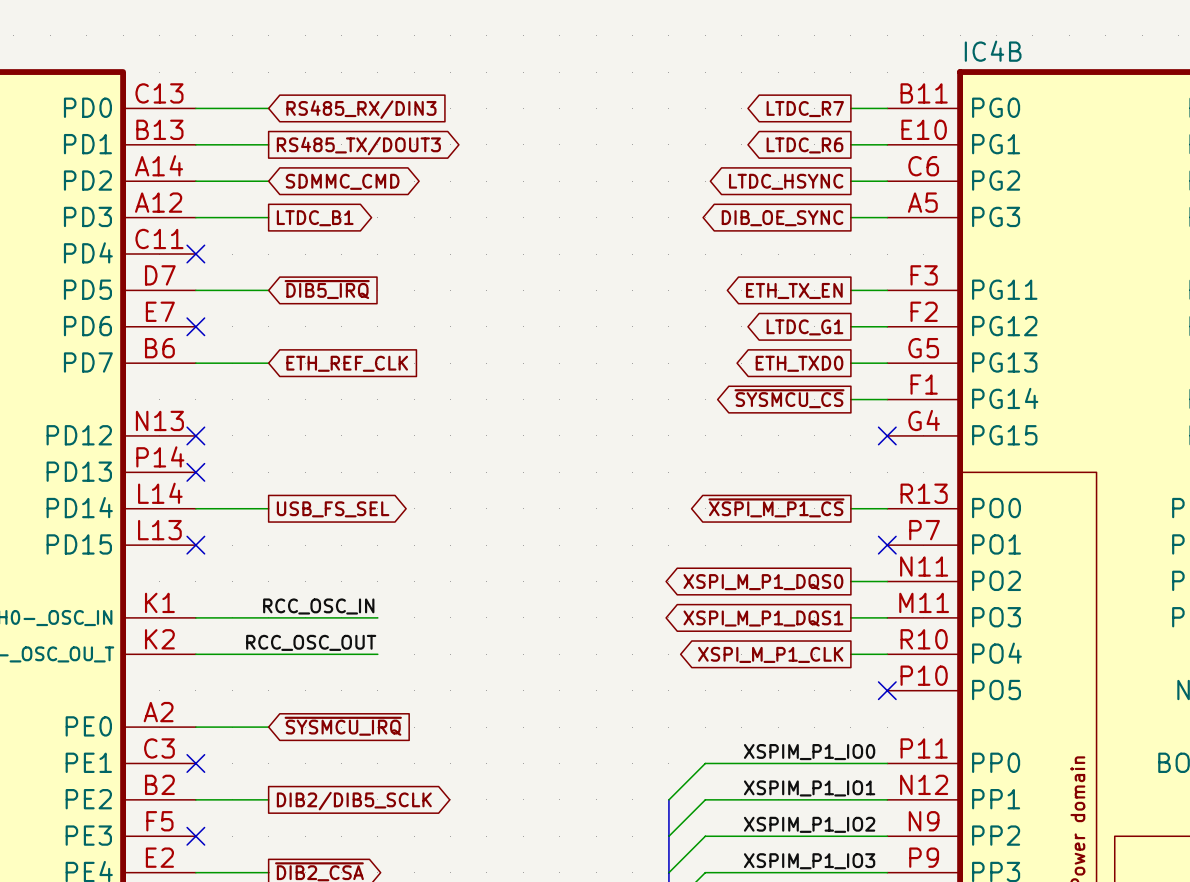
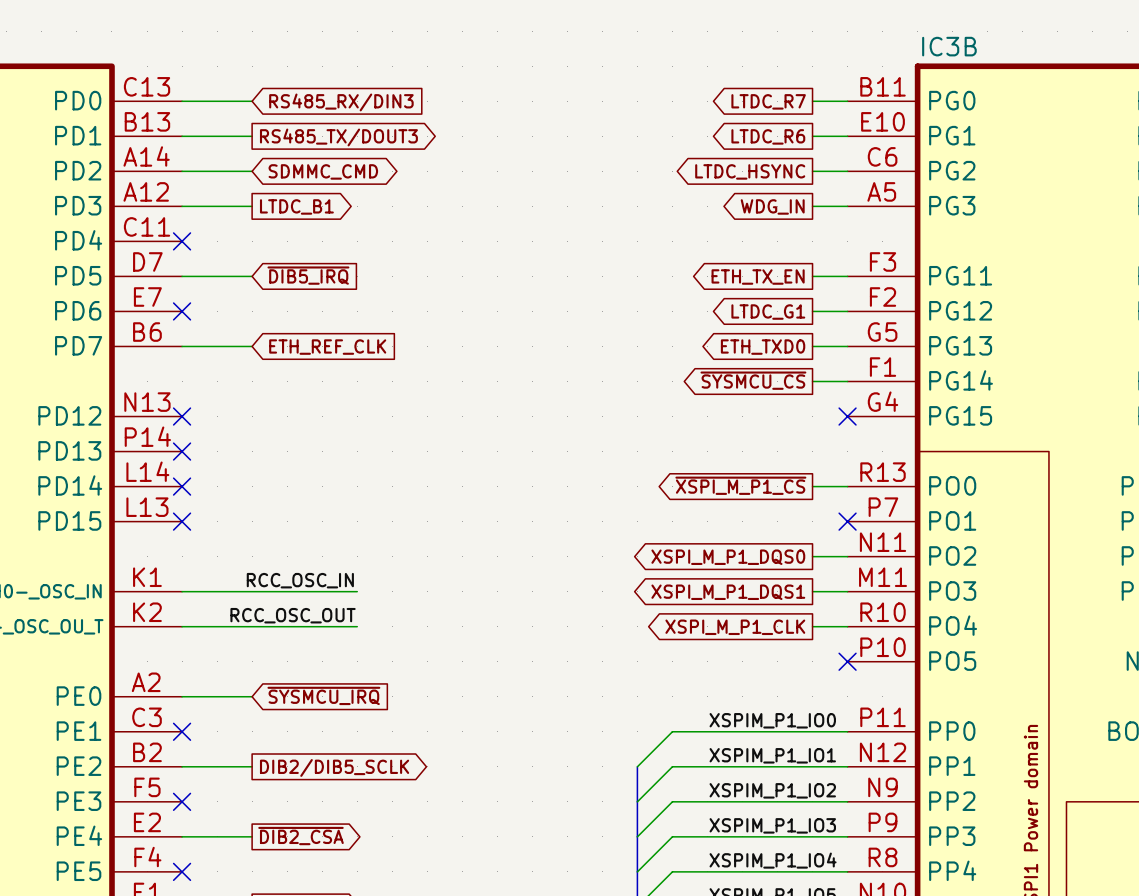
IC4B name: IC4B (993, 51) -> IC3B (949, 46)
global label: DIB_OE_SYNC (782, 218) -> WDG_IN (772, 206)
wire: (195, 508) (268, 508) -> none
no-connect mark: none -> (182, 486)
global label: USB_FS_SEL (333, 509) -> none

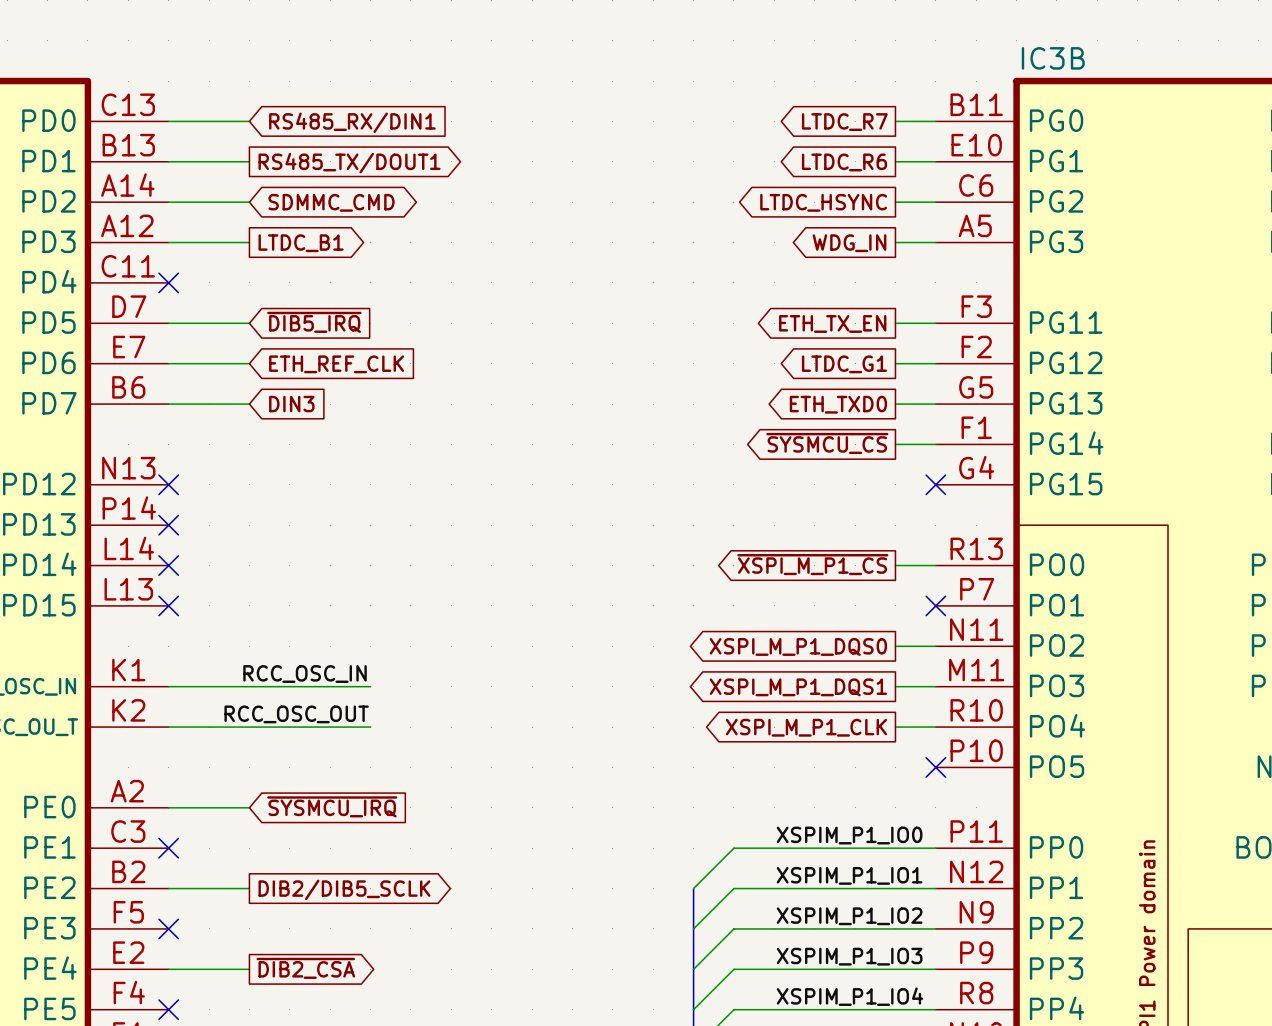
global label: RS485_RX/DIN3 (341, 102) -> RS485_RX/DIN1 (352, 122)
global label: RS485_TX/DOUT3 (338, 137) -> RS485_TX/DOUT1 (349, 163)
wire: none -> (168, 363) (249, 363)
no-connect mark: (182, 311) -> none
global label: none -> ETH_REF_CLK (336, 364)
global label: ETH_REF_CLK (327, 347) -> DIN3 (291, 404)

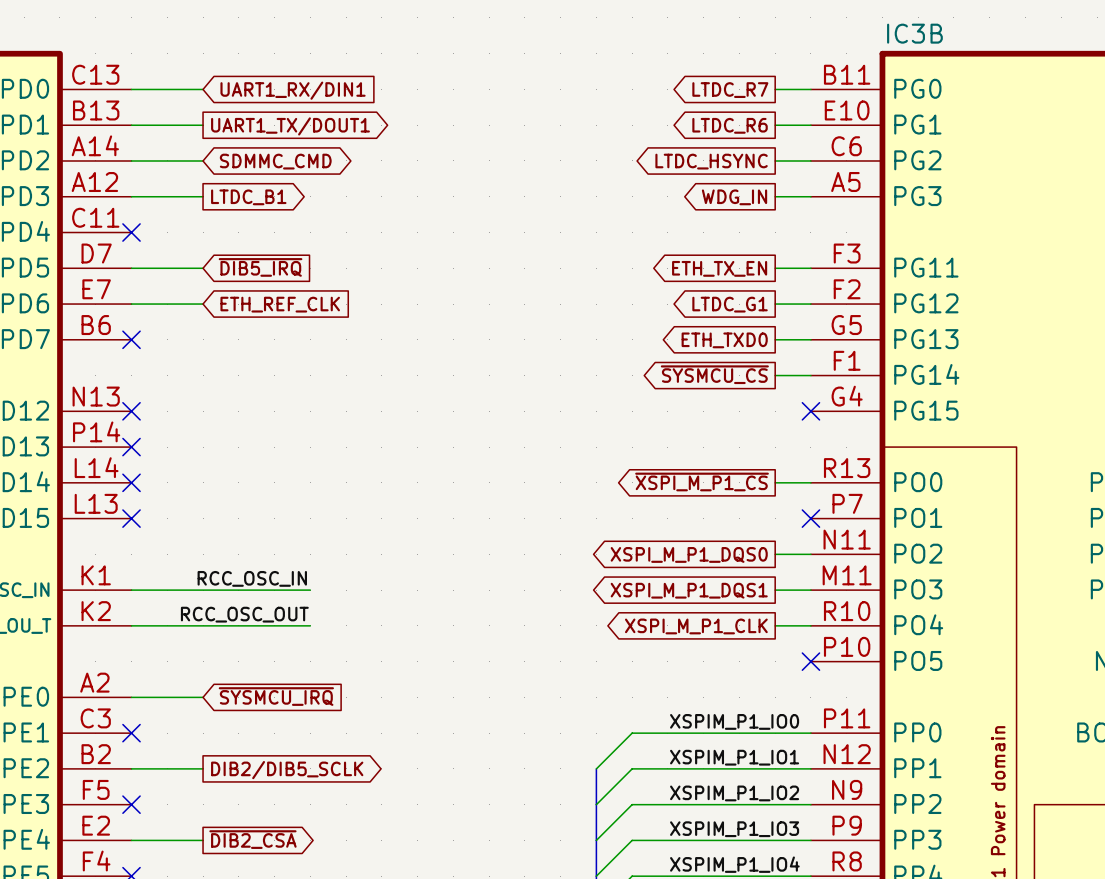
global label: RS485_RX/DIN1 (352, 122) -> UART1_RX/DIN1 (293, 90)
global label: RS485_TX/DOUT1 (349, 163) -> UART1_TX/DOUT1 (290, 126)
wire: (168, 404) (249, 404) -> none
no-connect mark: none -> (131, 339)
global label: DIN3 (291, 404) -> none

